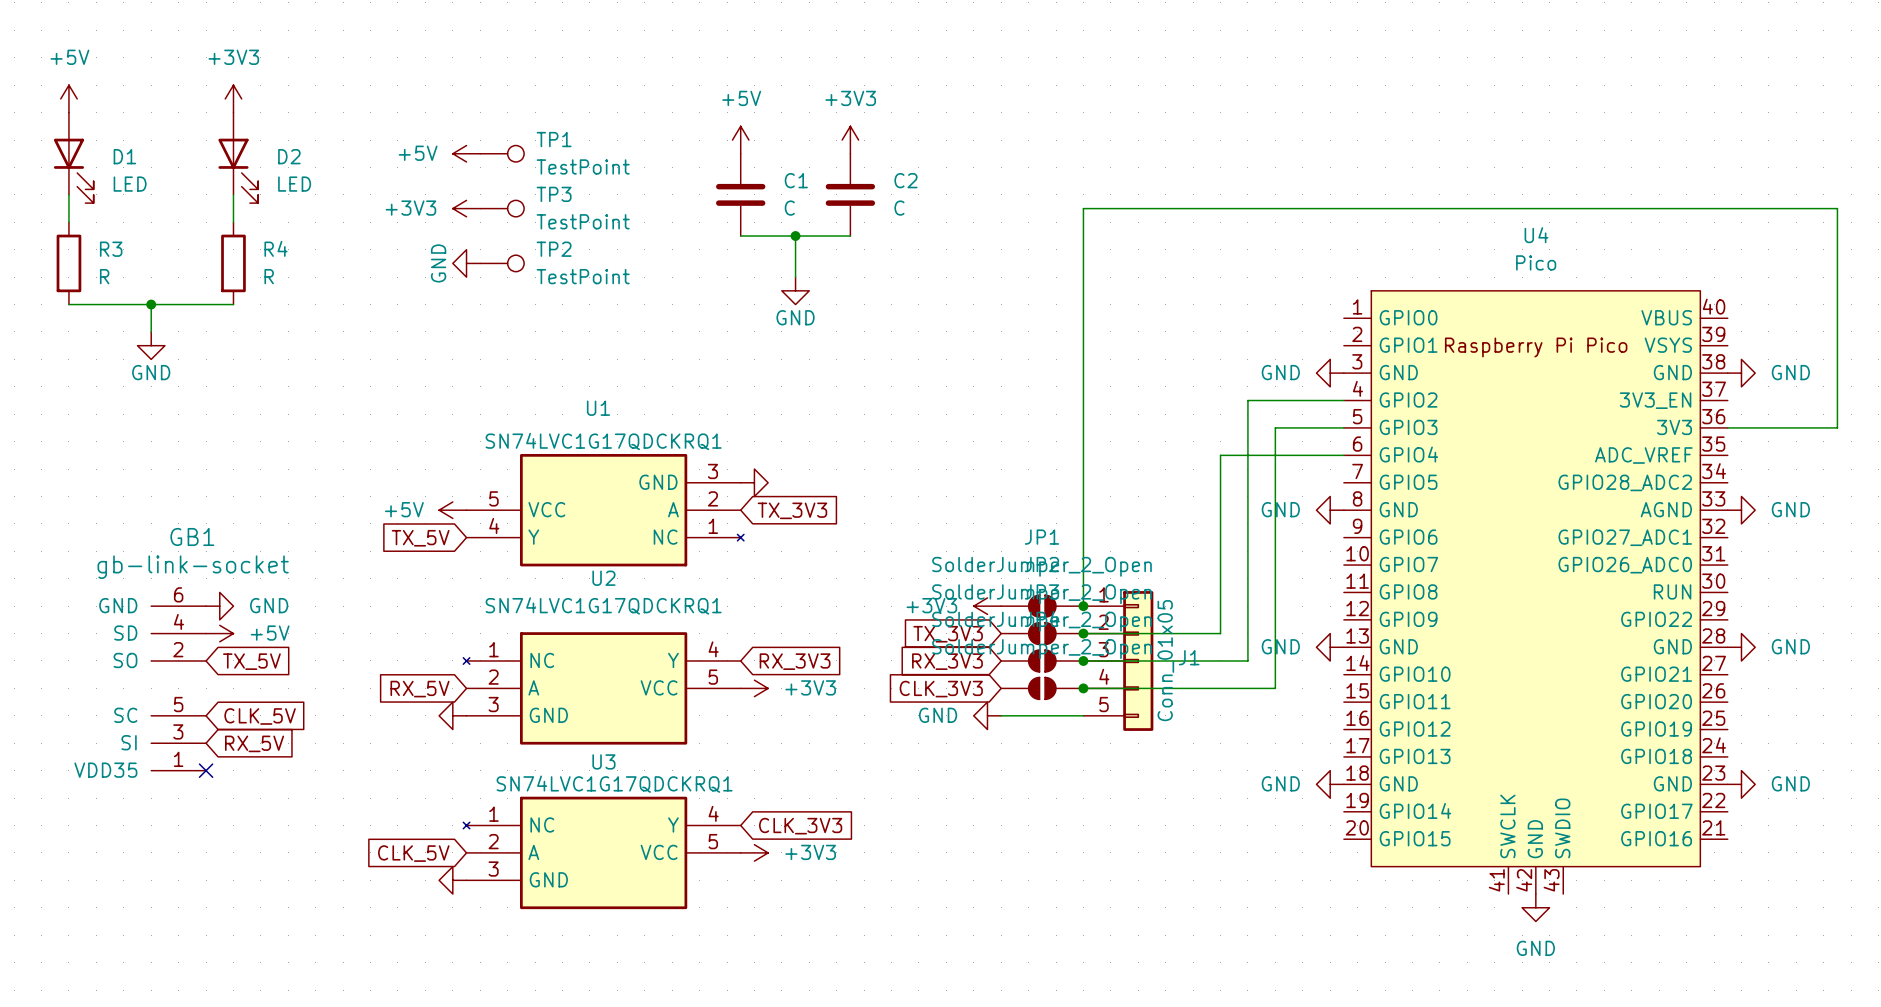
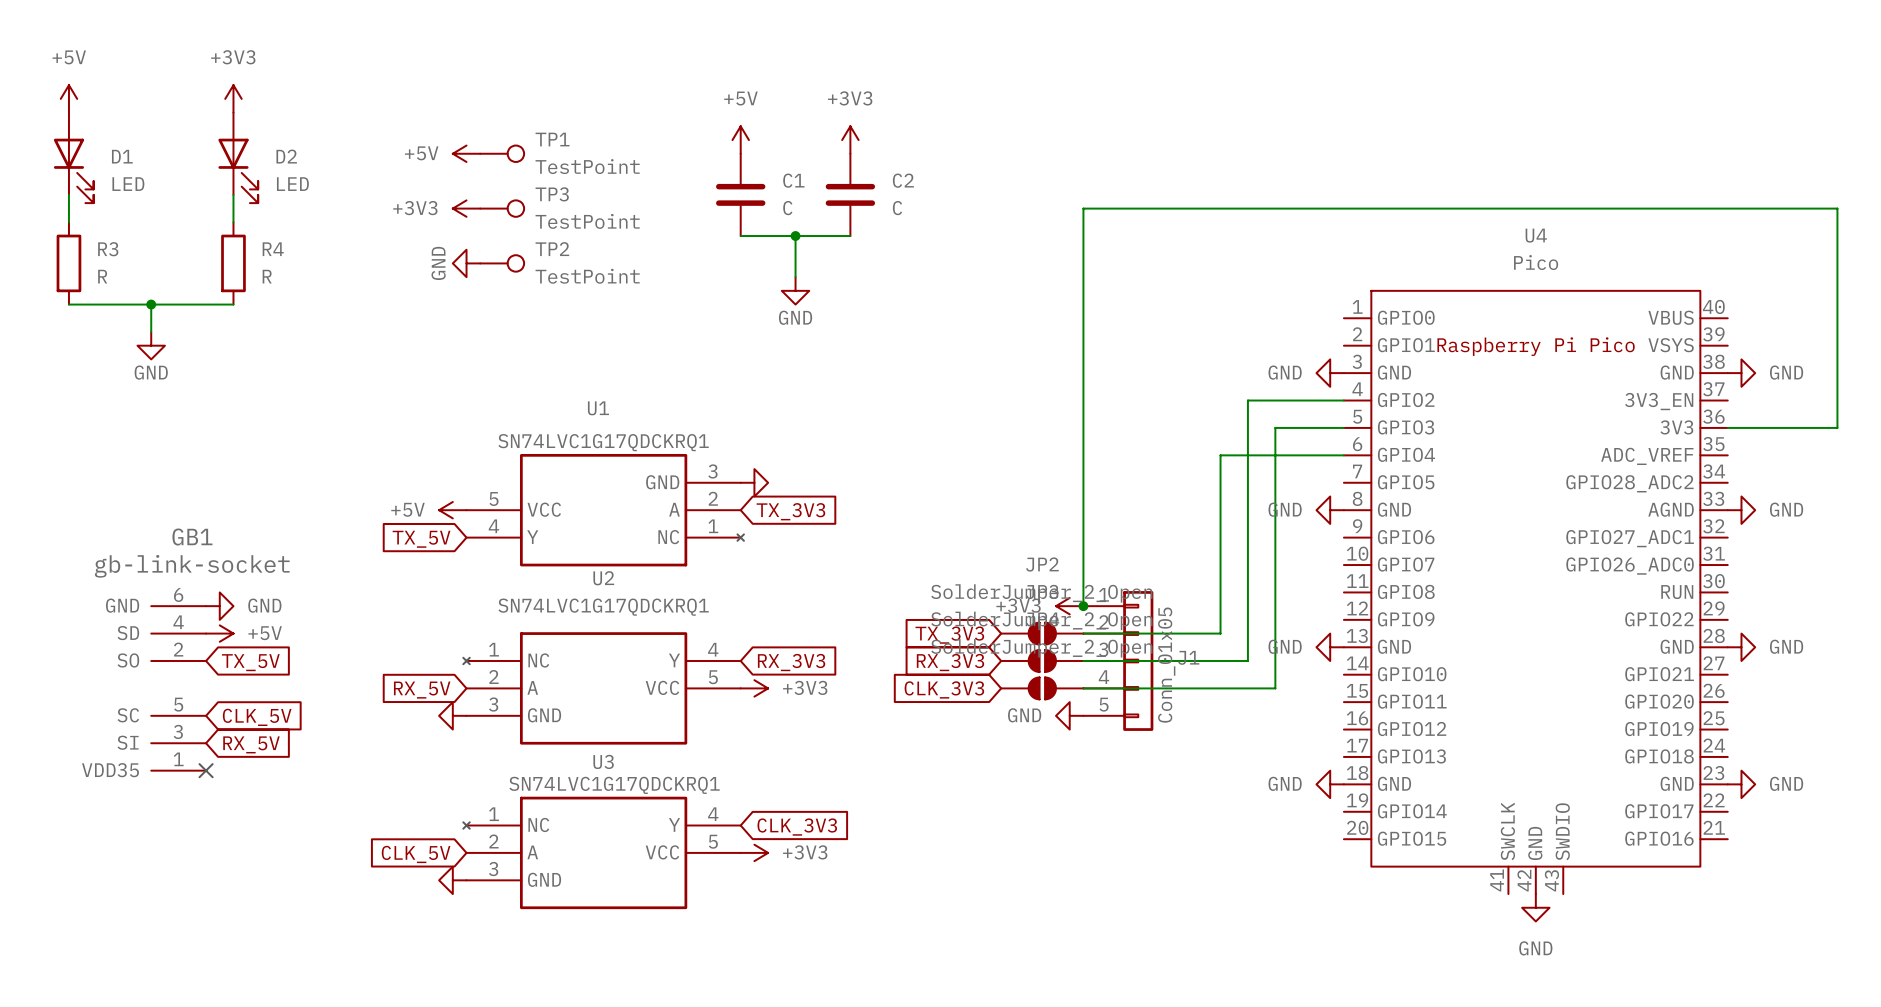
power symbol position: +3V3 (987, 606) -> +3V3 (1069, 606)
JP1: SolderJumper_2_Open (1042, 606) -> none
junction: (1083, 633) -> none
junction: (1083, 660) -> none
junction: (1083, 688) -> none
power symbol position: GND (987, 715) -> GND (1069, 715)
wire: (1001, 715) (1083, 715) -> none

